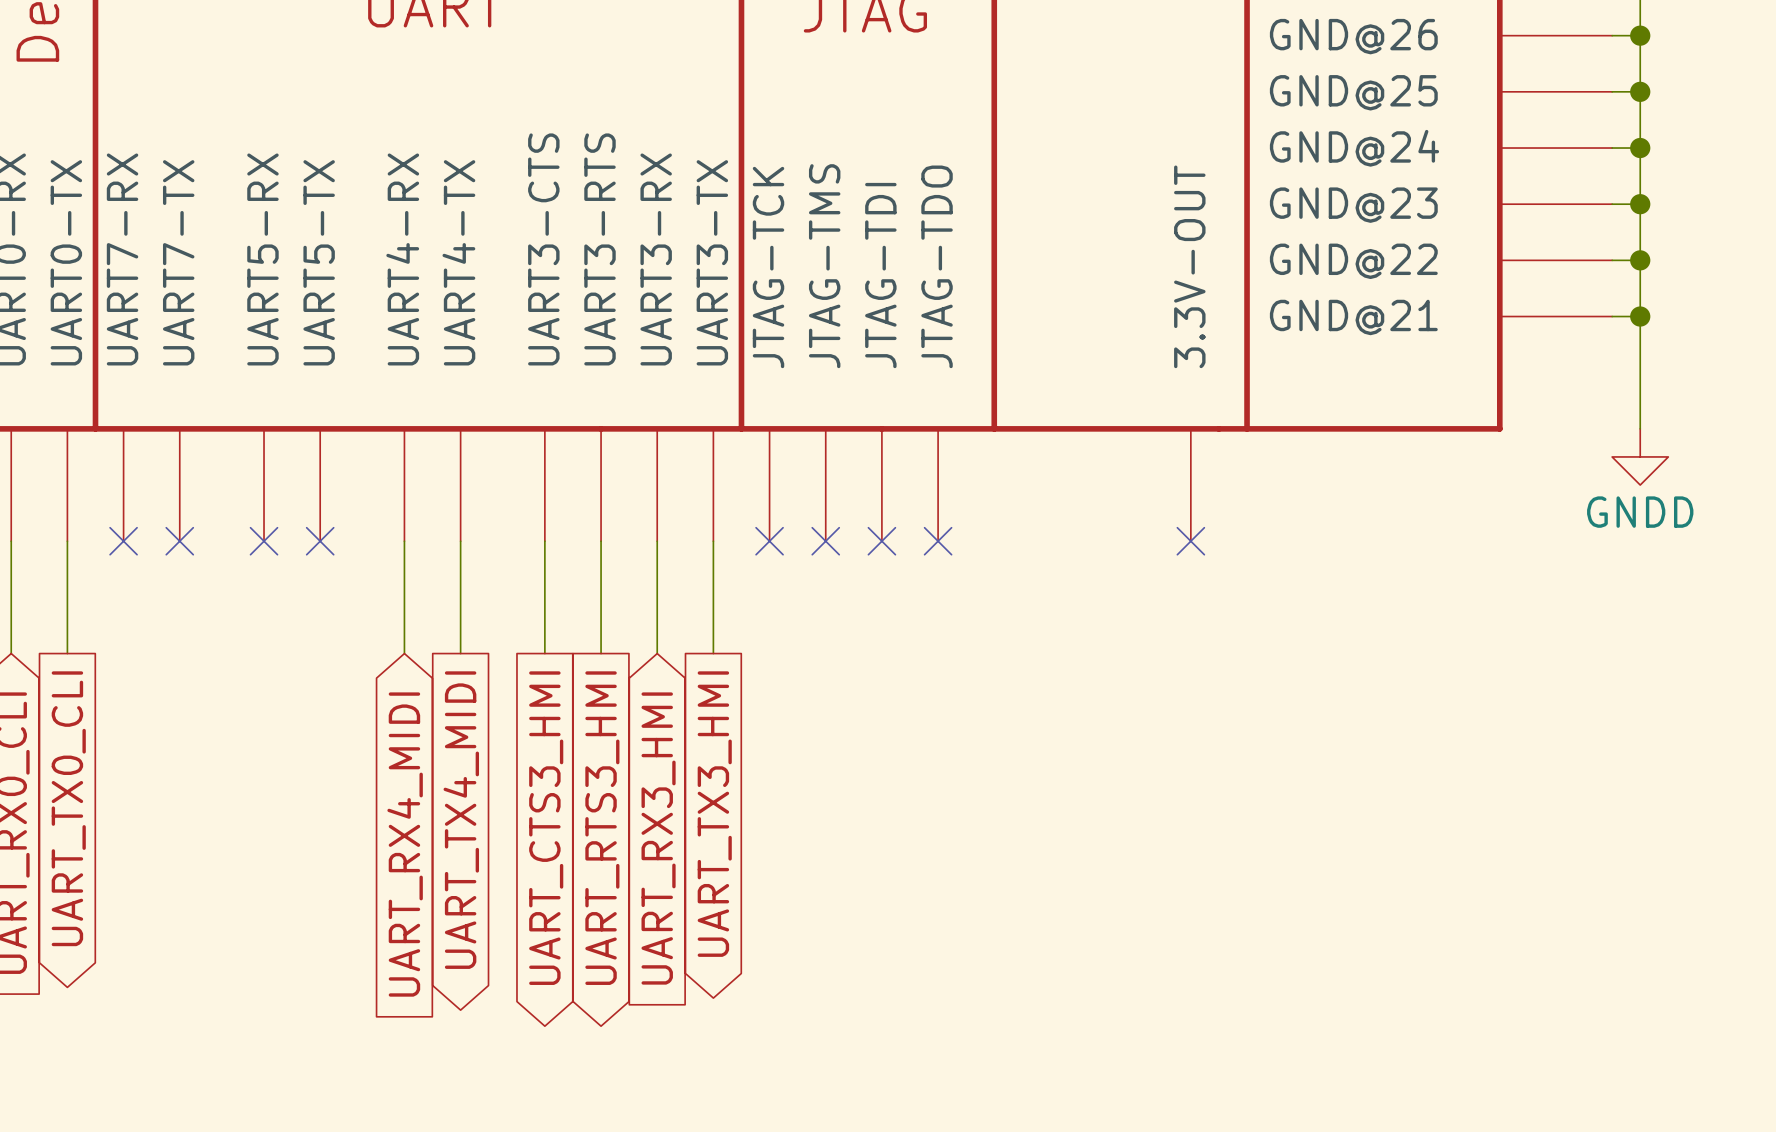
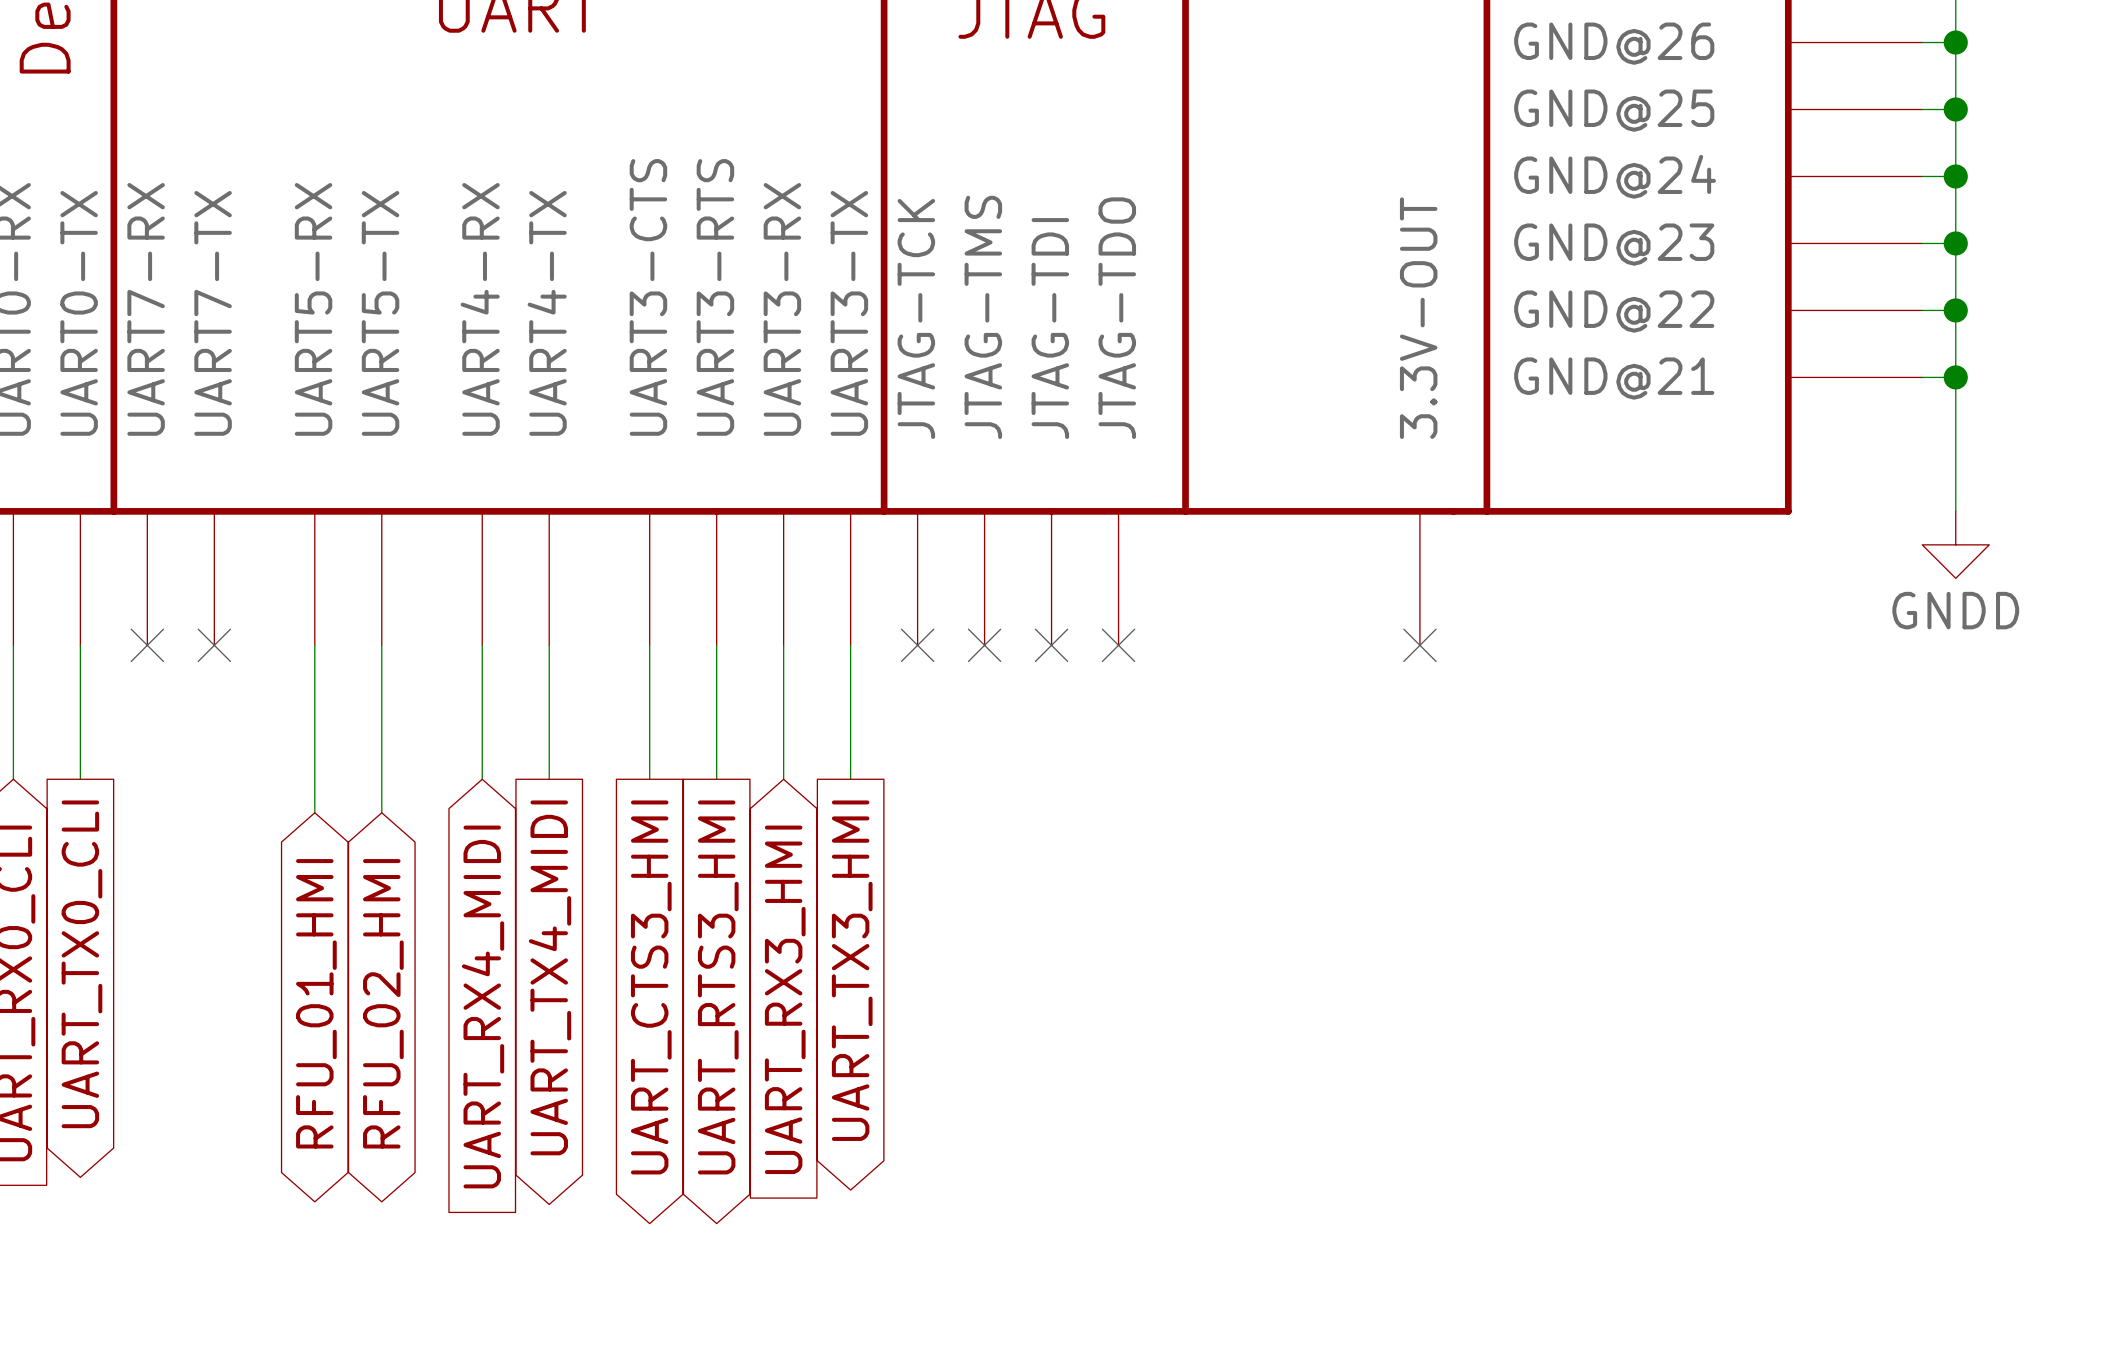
wire: none -> (314, 645) (314, 812)
no-connect mark: (264, 541) -> none
wire: none -> (381, 645) (381, 812)
no-connect mark: (320, 541) -> none
global label: none -> RFU_01_HMI (316, 1003)
global label: none -> RFU_02_HMI (383, 1003)

